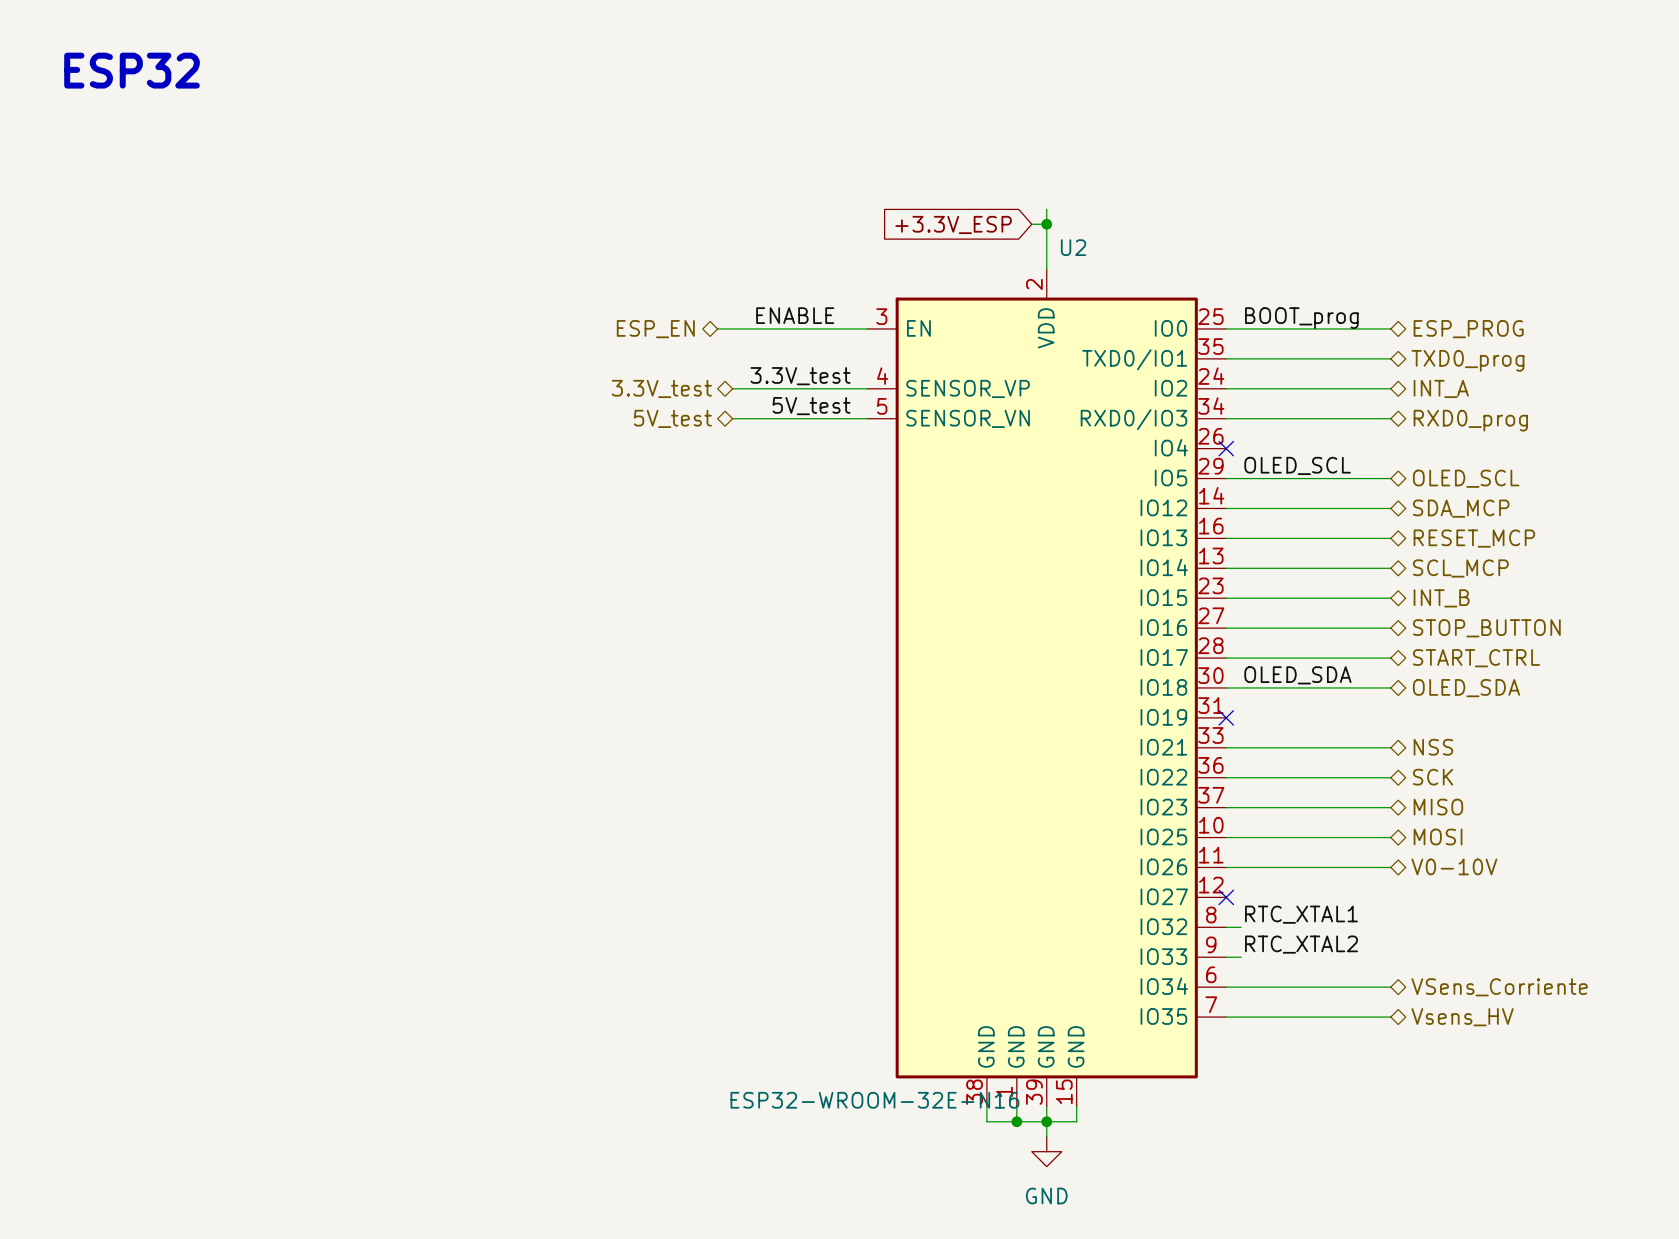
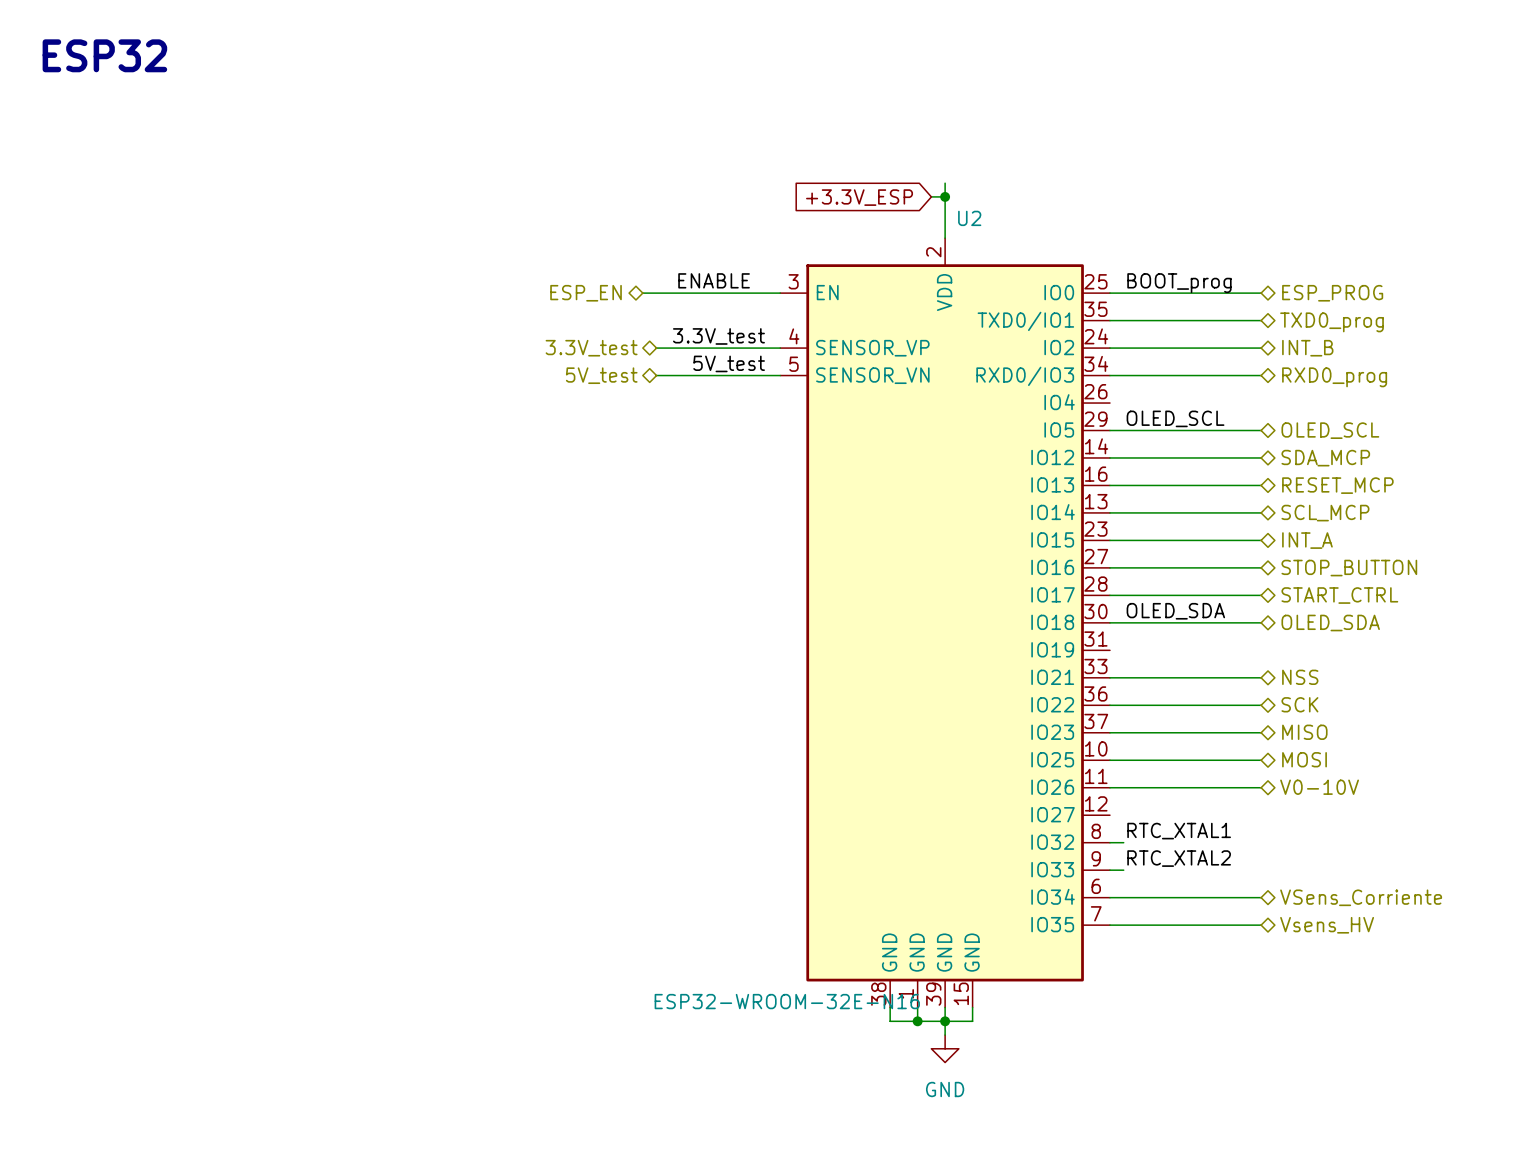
hierarchical label: INT_A (1441, 388) -> INT_B (1307, 348)
no-connect mark: (1226, 448) -> none
hierarchical label: INT_B (1441, 598) -> INT_A (1307, 540)
no-connect mark: (1226, 717) -> none
no-connect mark: (1226, 897) -> none

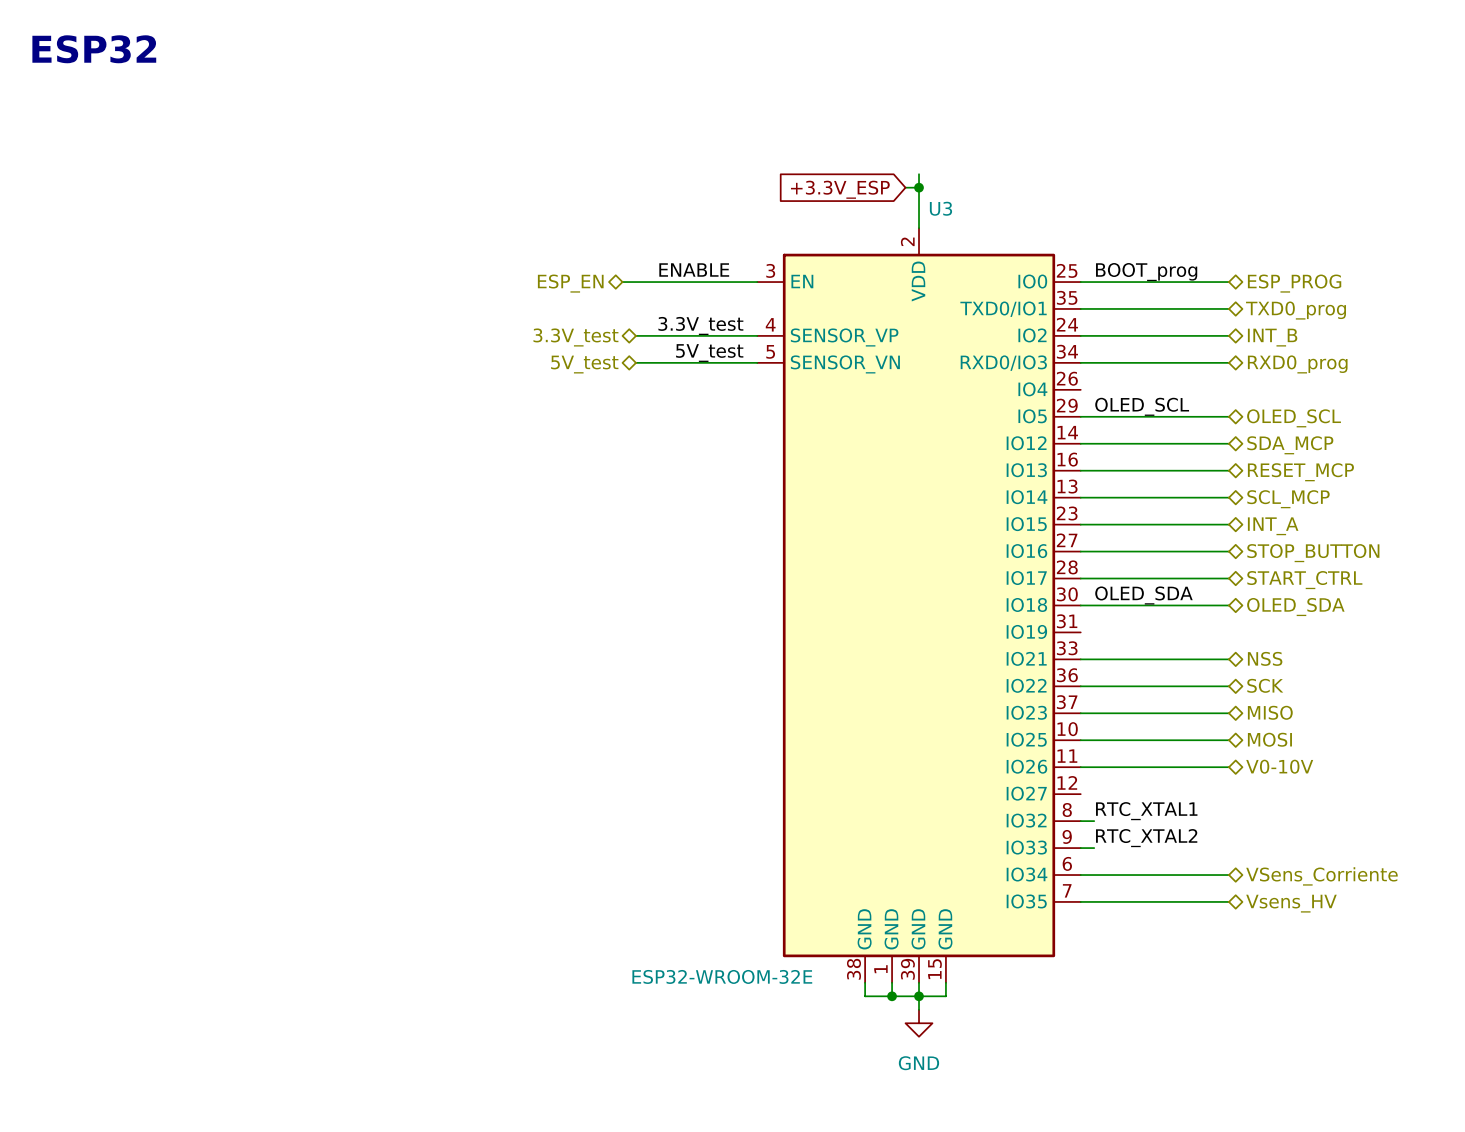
U2 name: U2 (969, 218) -> U3 (940, 208)
U2 value: ESP32-WROOM-32E-N16 (787, 1001) -> ESP32-WROOM-32E (722, 976)

